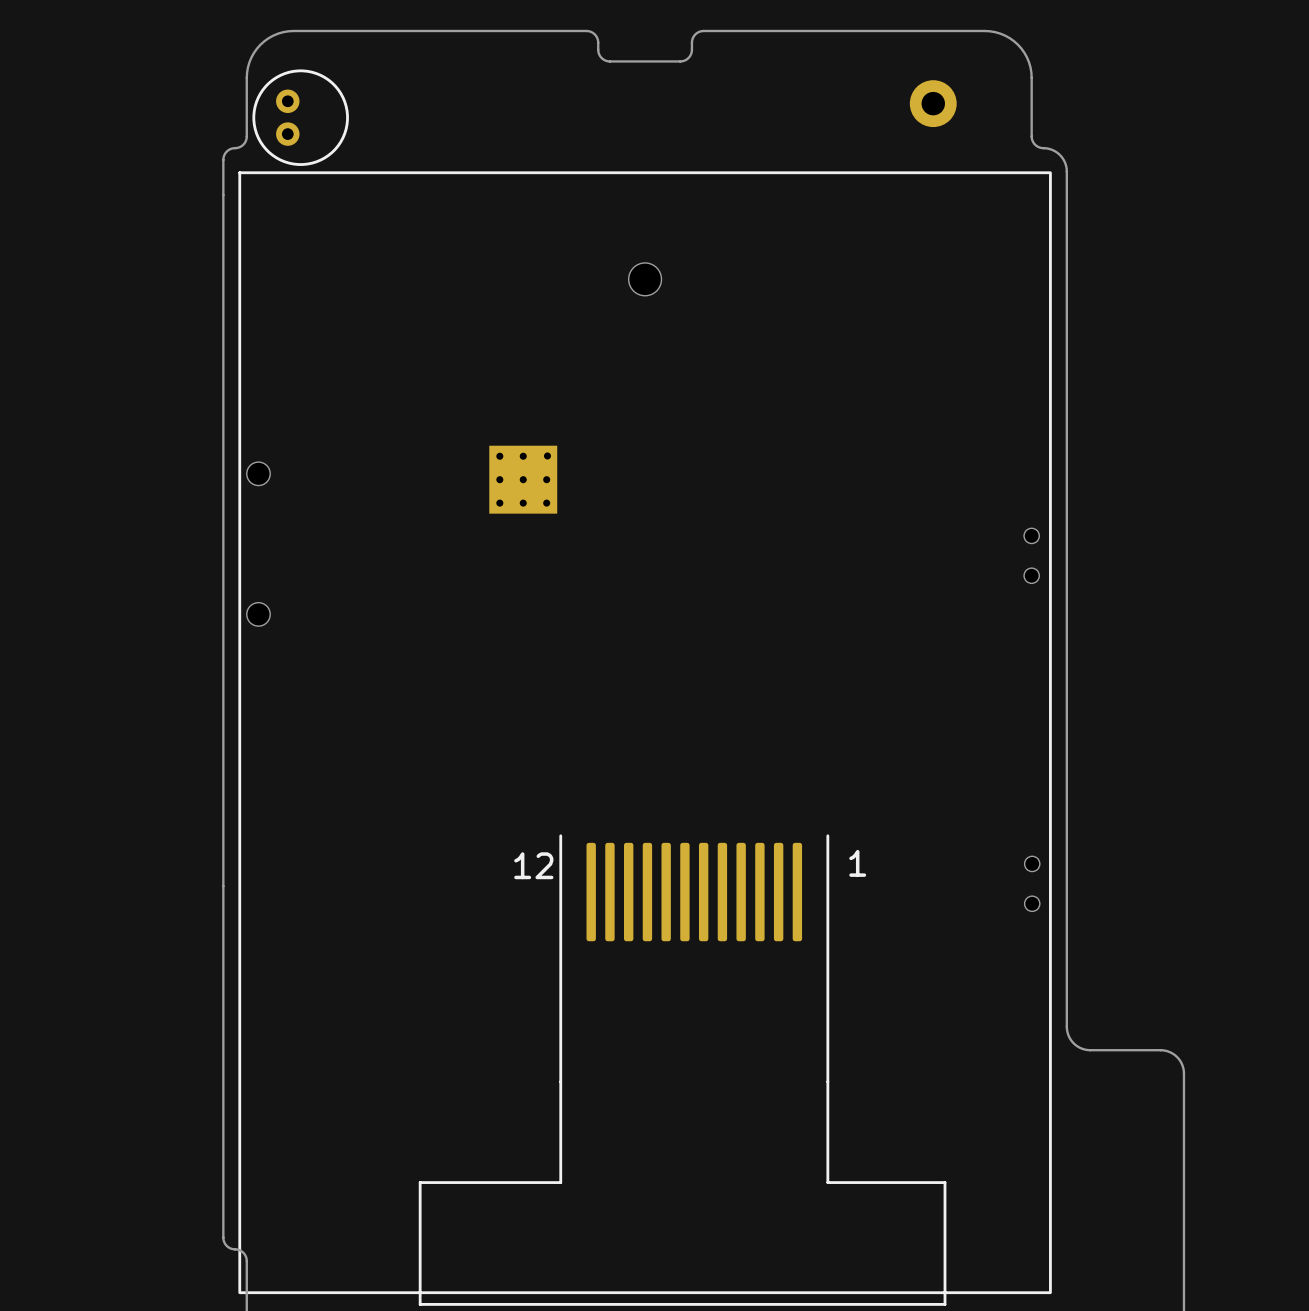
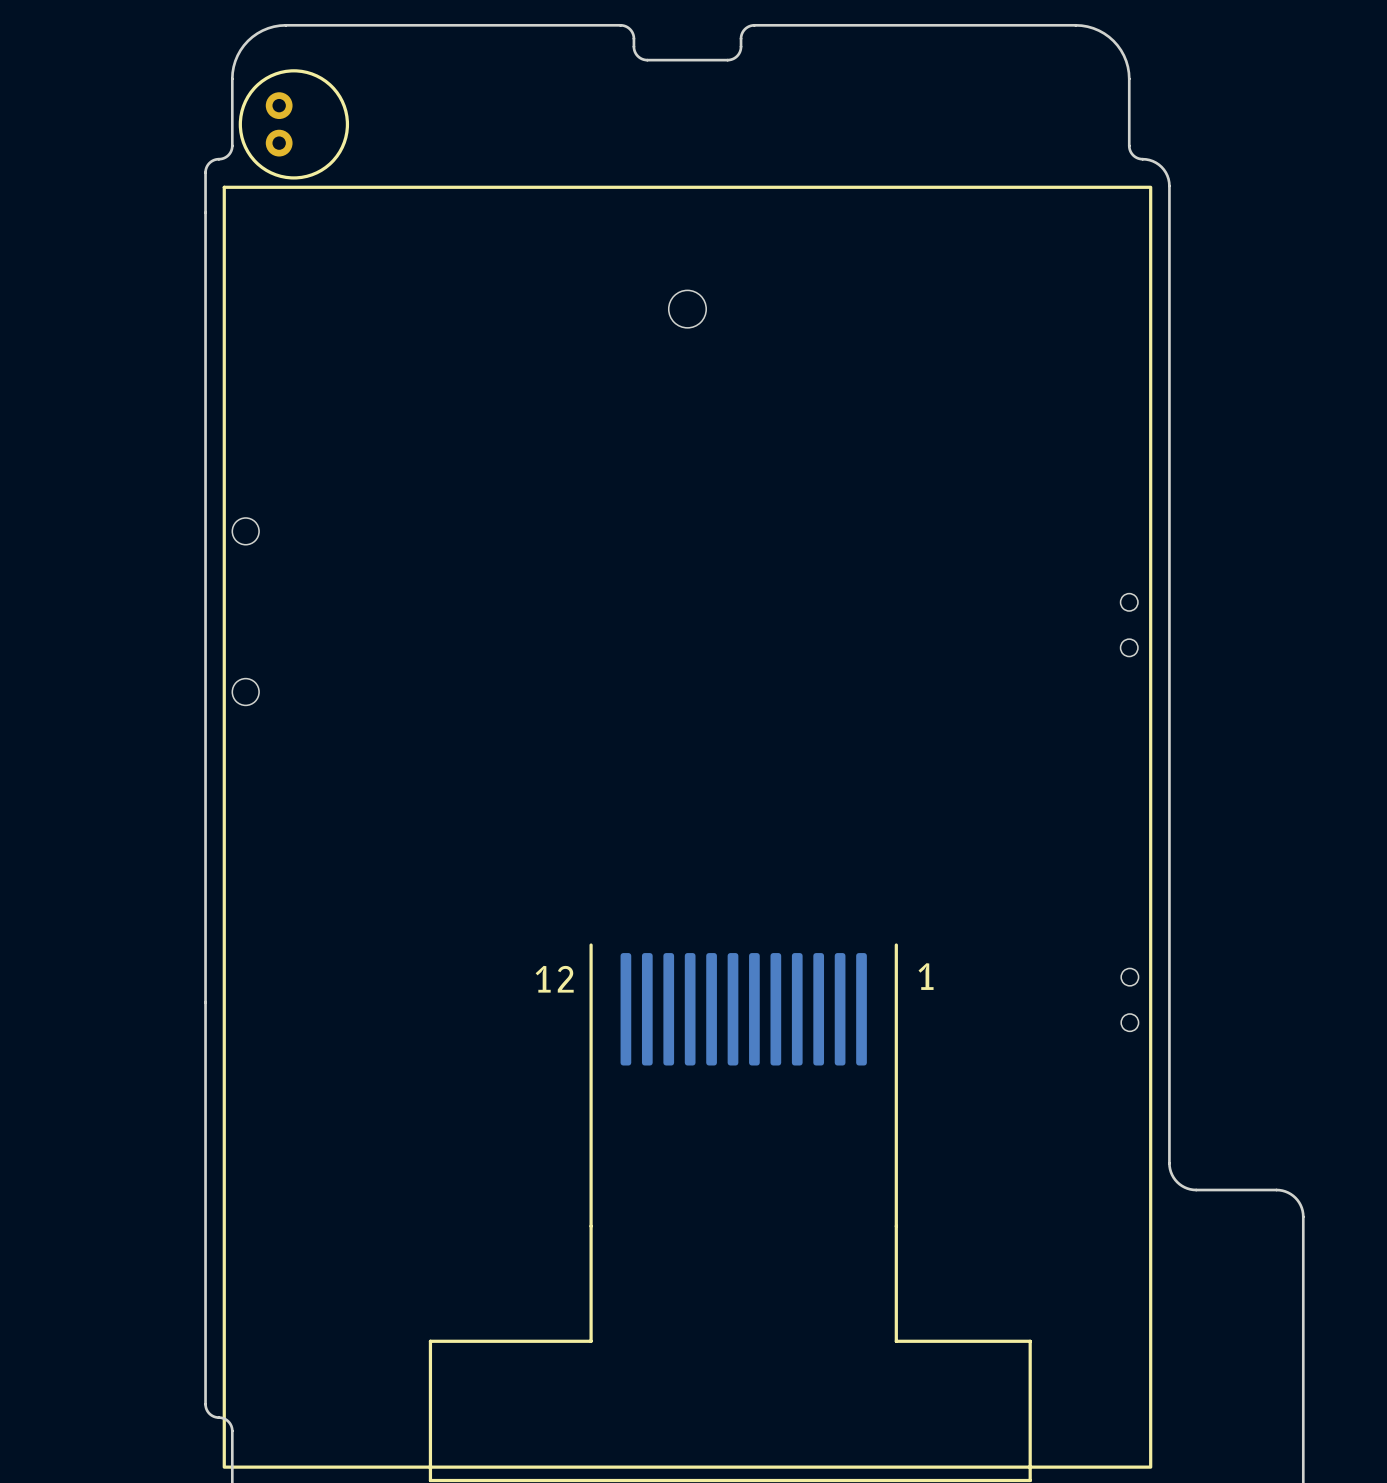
part: (933, 103) -> none
part: (523, 479) -> none

